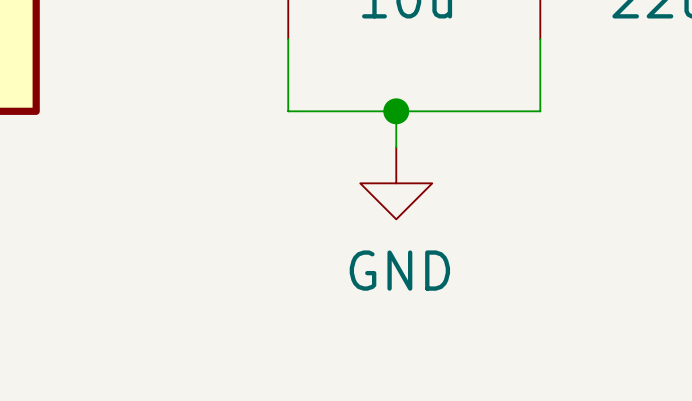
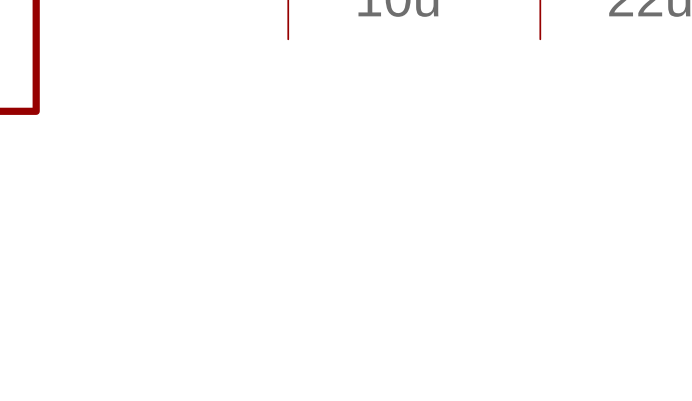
wire: (288, 39) (288, 111) (540, 111) (540, 39) -> none
wire: (396, 111) (396, 147) -> none
junction: (396, 111) -> none
power symbol: GND (396, 183) -> none

